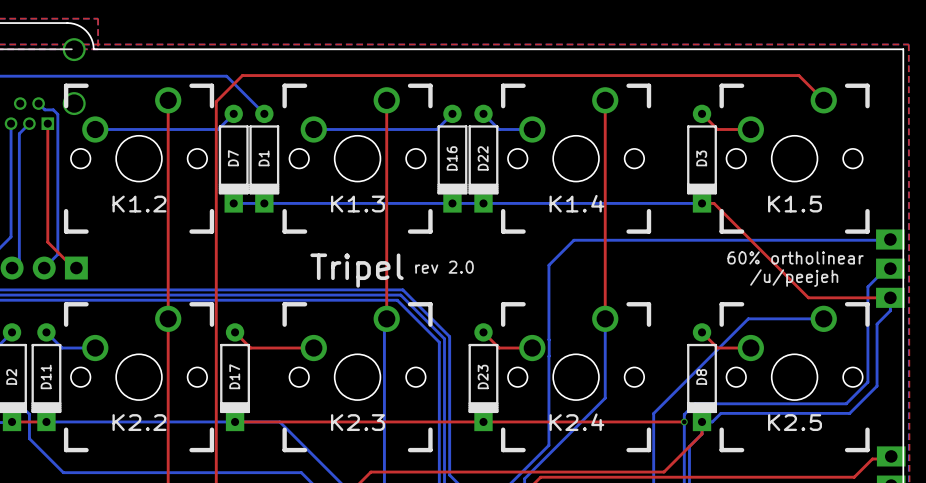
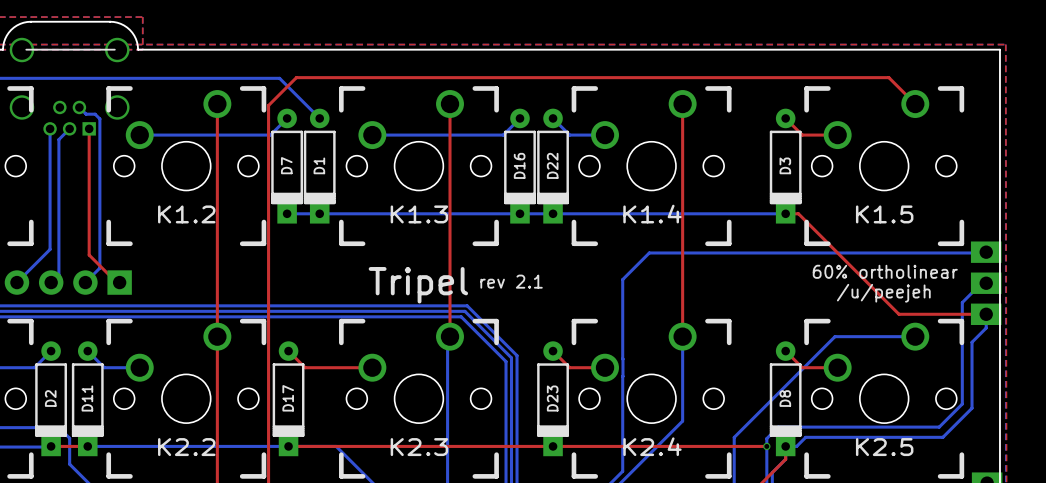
text: rev 2.0 (444, 267) -> rev 2.1 (511, 281)

